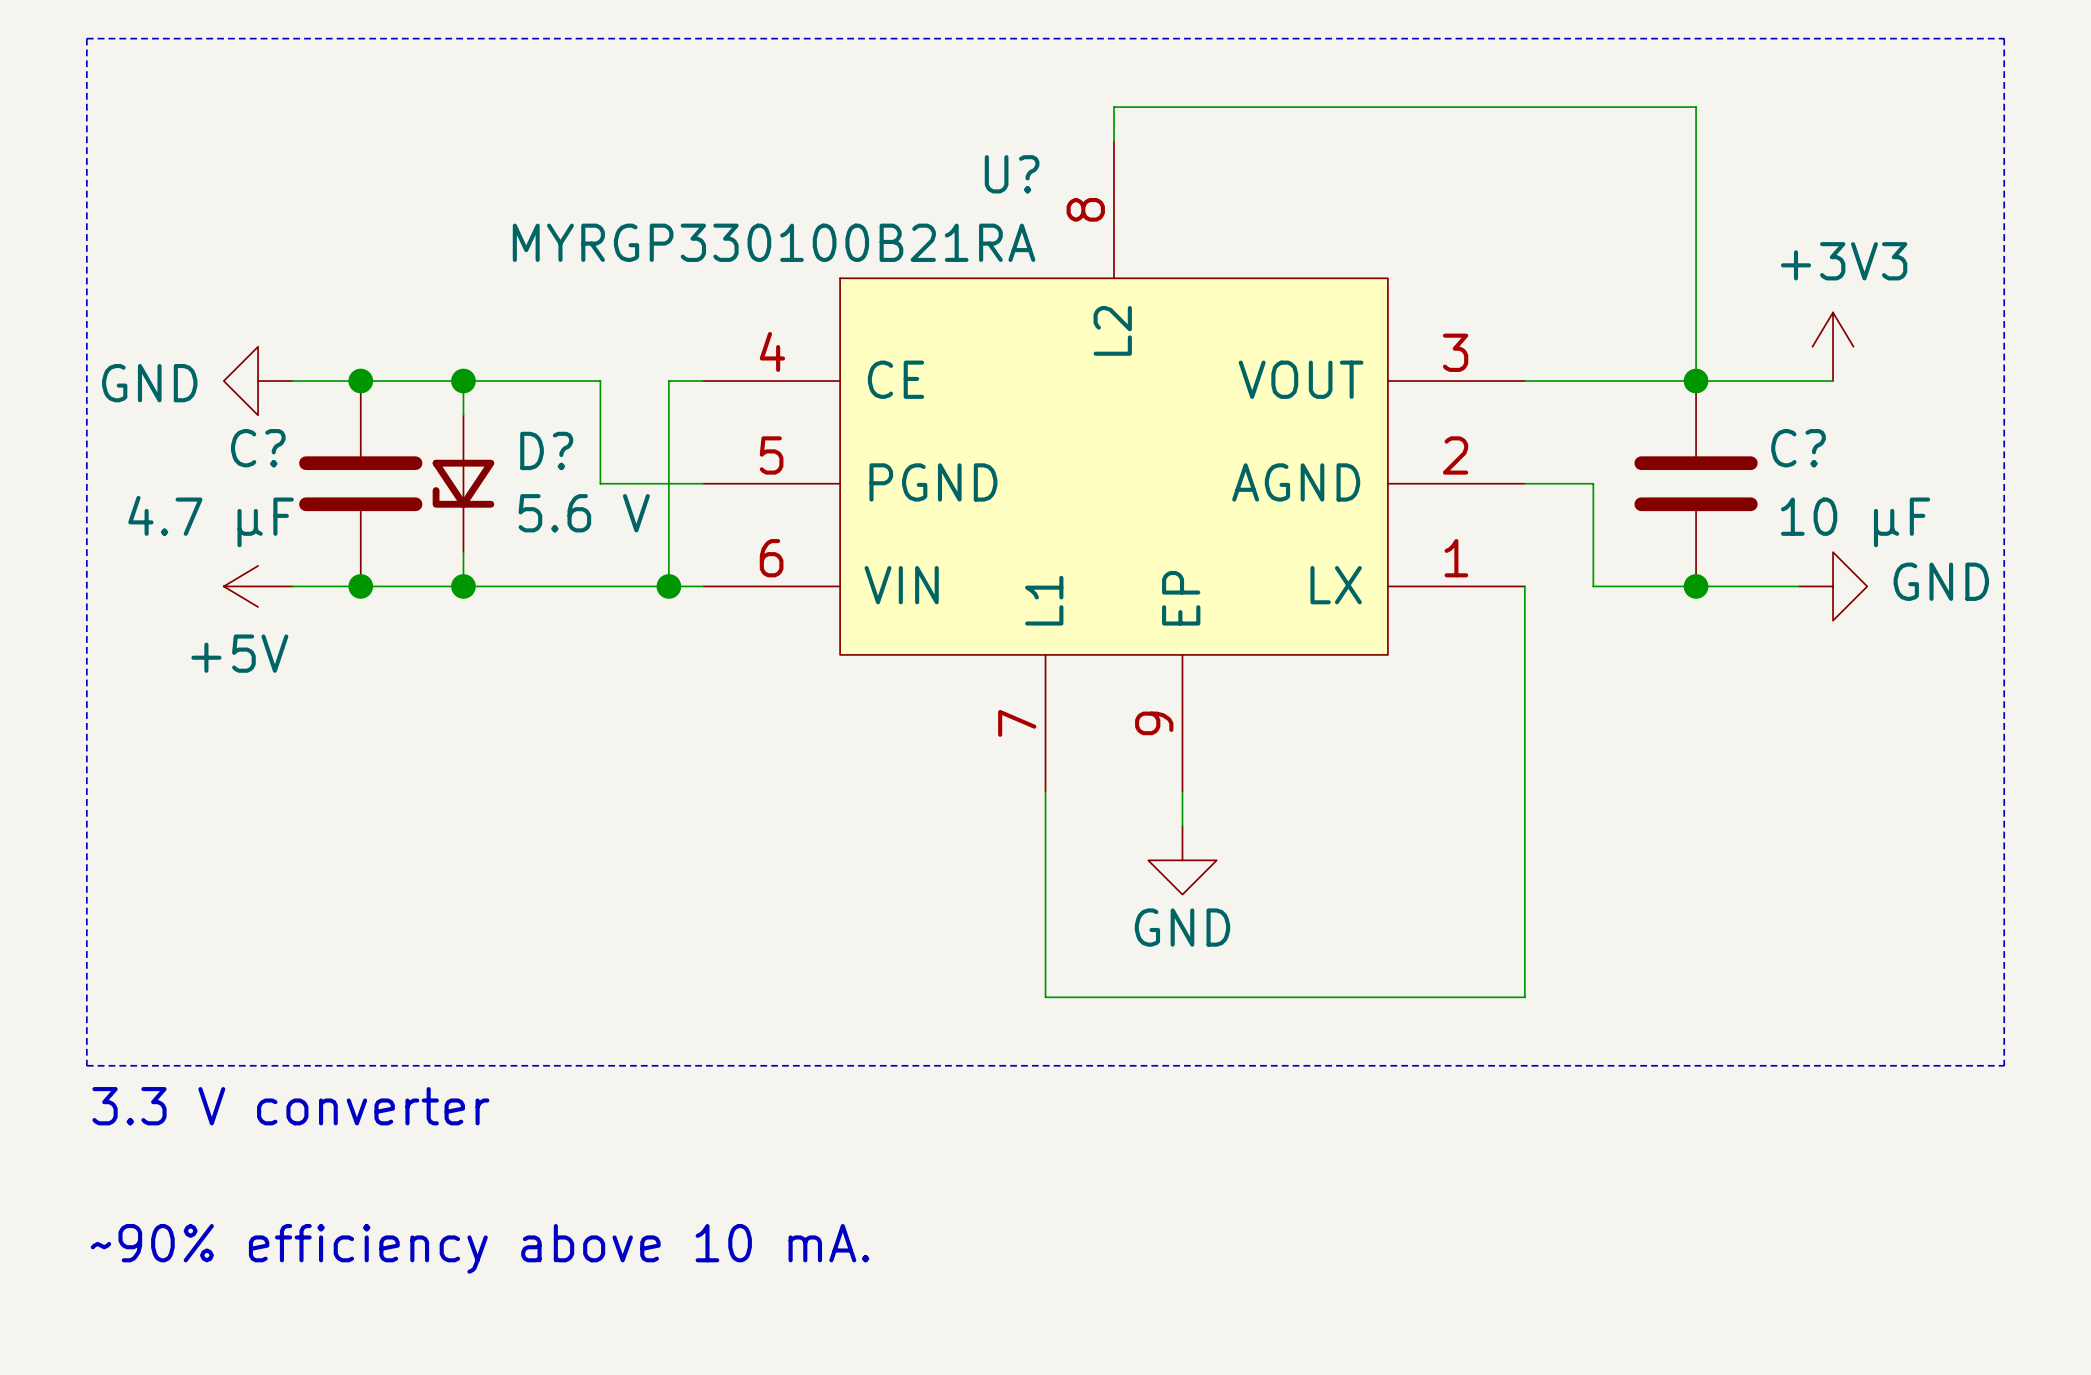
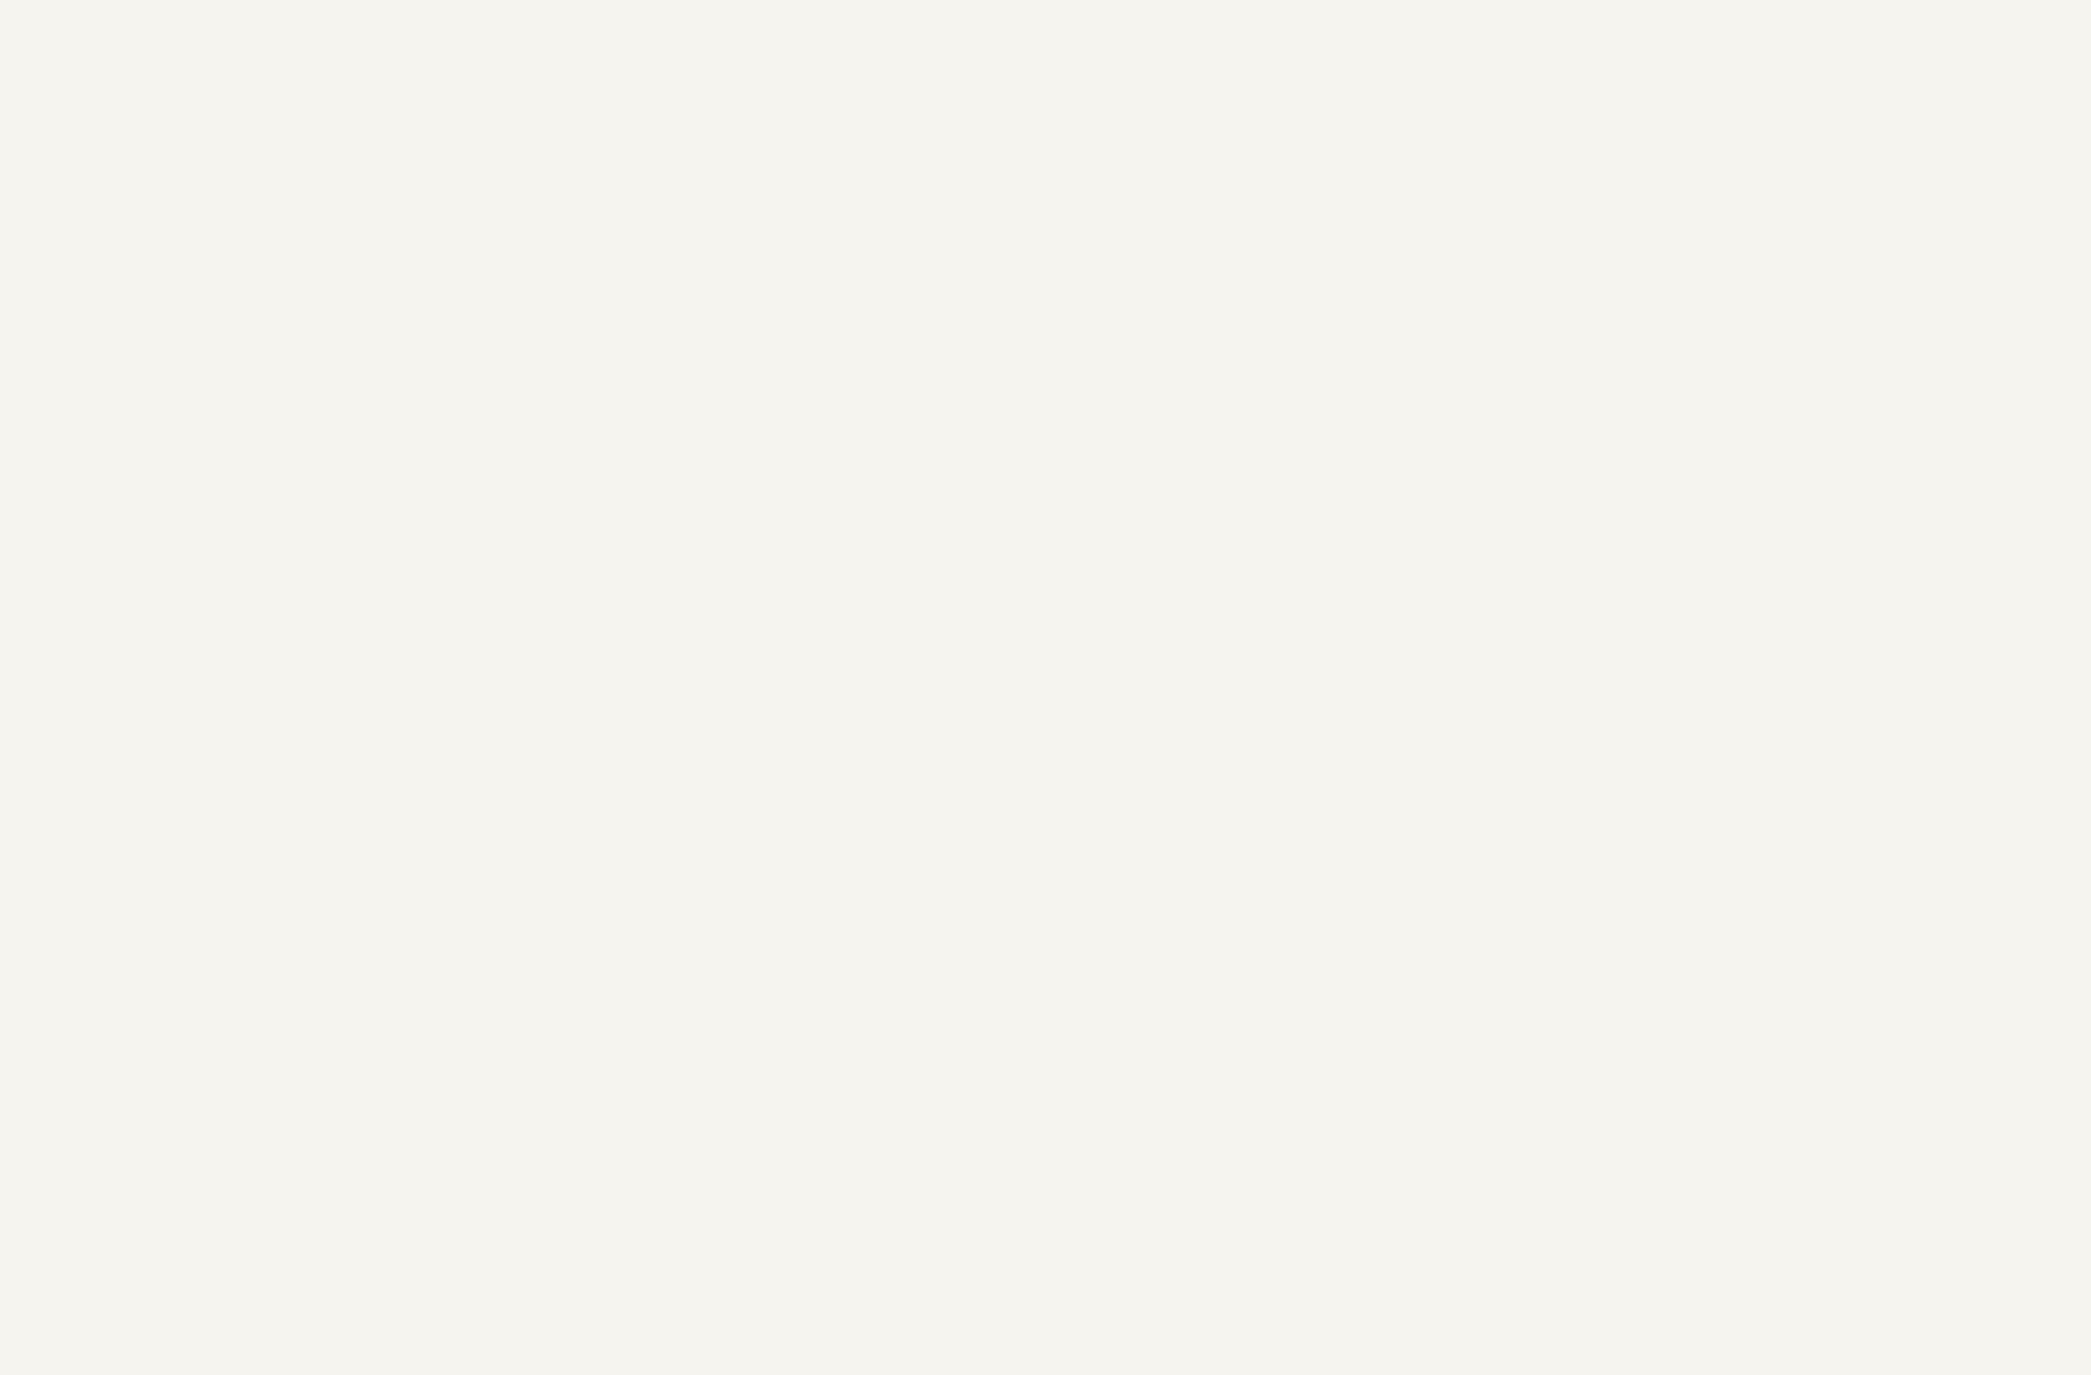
line: (86, 38) (86, 1065) (2004, 1065) (2004, 38) (86, 38) -> none
wire: (1114, 141) (1114, 107) (1696, 107) (1696, 381) -> none
power symbol: +3V3 (1833, 346) -> none
power symbol: GND (258, 381) -> none
wire: (292, 381) (600, 381) (600, 483) (703, 483) -> none
junction: (360, 381) -> none
wire: (463, 381) (463, 415) -> none
junction: (463, 381) -> none
wire: (703, 381) (668, 381) (668, 586) -> none
wire: (1524, 381) (1833, 381) -> none
junction: (1696, 381) -> none
U?: MYRGP330100B21RA (1114, 466) -> none
C?: 4.7 µF (360, 483) -> none
D?: 5.6 V (463, 483) -> none
wire: (1524, 483) (1593, 483) (1593, 586) (1798, 586) -> none
C?: 10 µF (1696, 483) -> none
wire: (463, 552) (463, 586) -> none
power symbol: +5V (258, 586) -> none
wire: (292, 586) (703, 586) -> none
junction: (360, 586) -> none
junction: (463, 586) -> none
junction: (668, 586) -> none
wire: (1524, 586) (1524, 997) (1045, 997) (1045, 791) -> none
junction: (1696, 586) -> none
power symbol: GND (1833, 586) -> none
wire: (1182, 791) (1182, 826) -> none
power symbol: GND (1182, 860) -> none
text: 3.3 V converter (290, 1106) -> none
text: ~90% efficiency above 10 mA. (480, 1248) -> none

